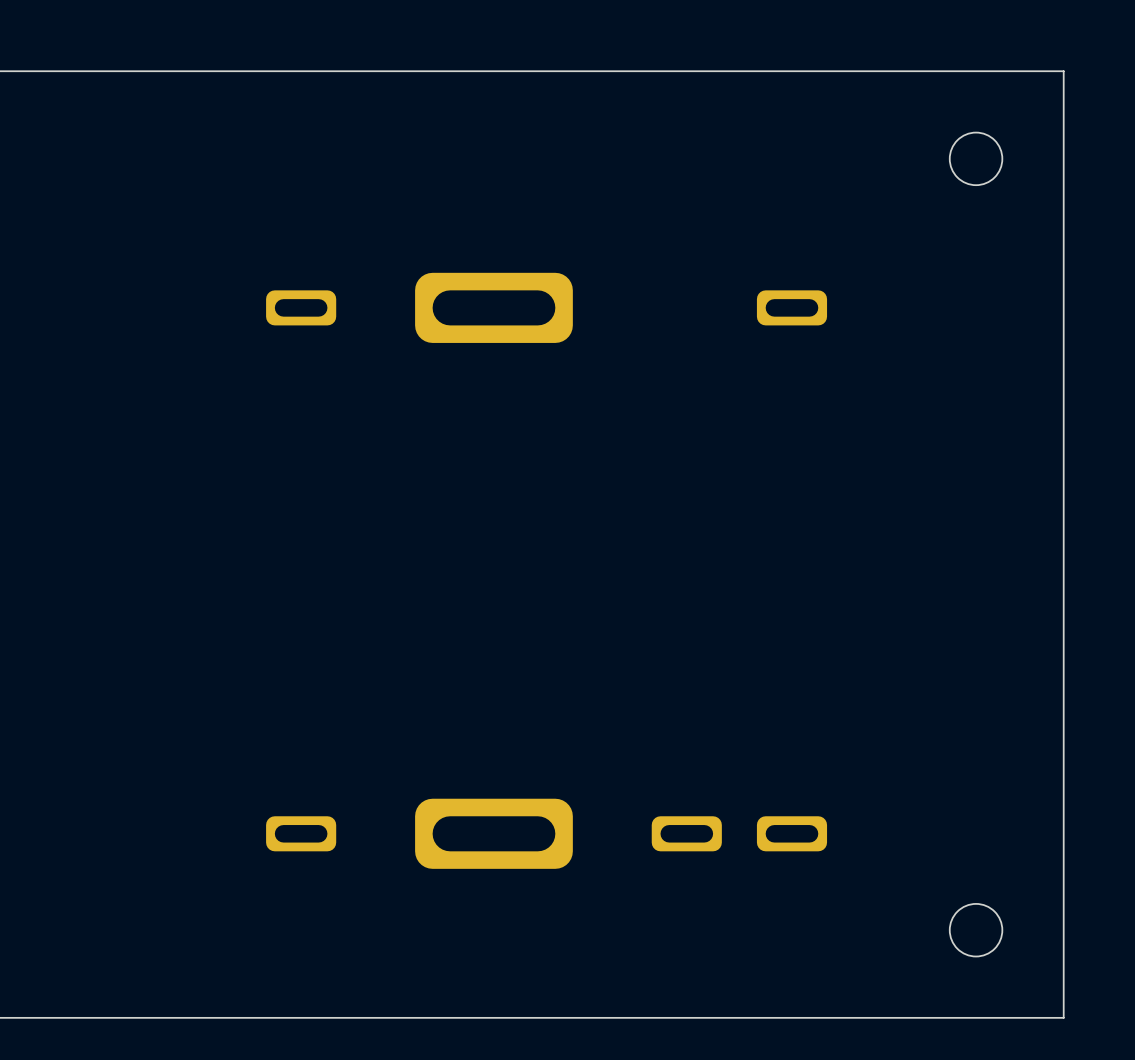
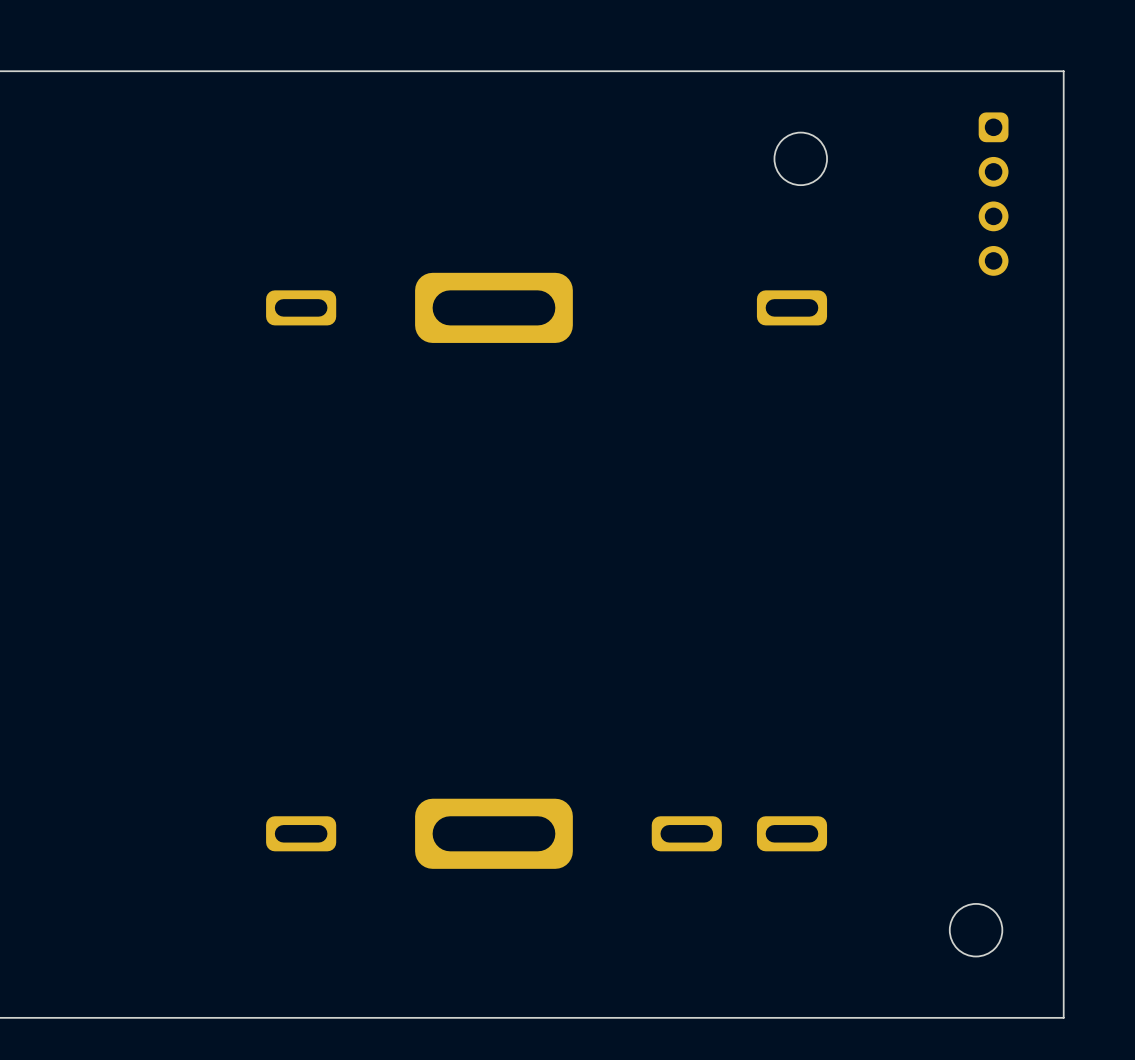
round board edge position: (976, 158) -> (800, 158)
part: none -> (993, 194)

